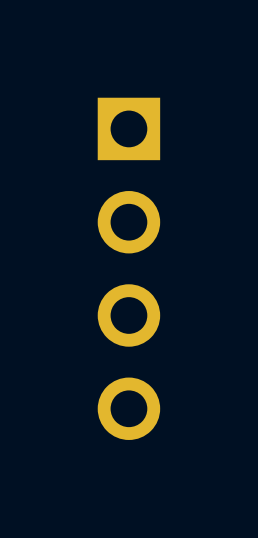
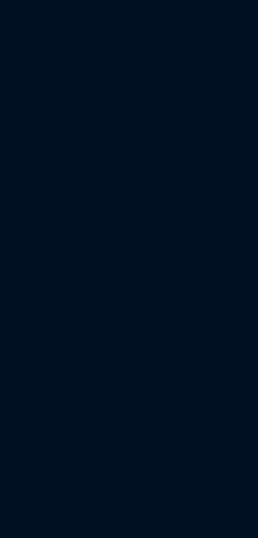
part: (128, 268) -> none

